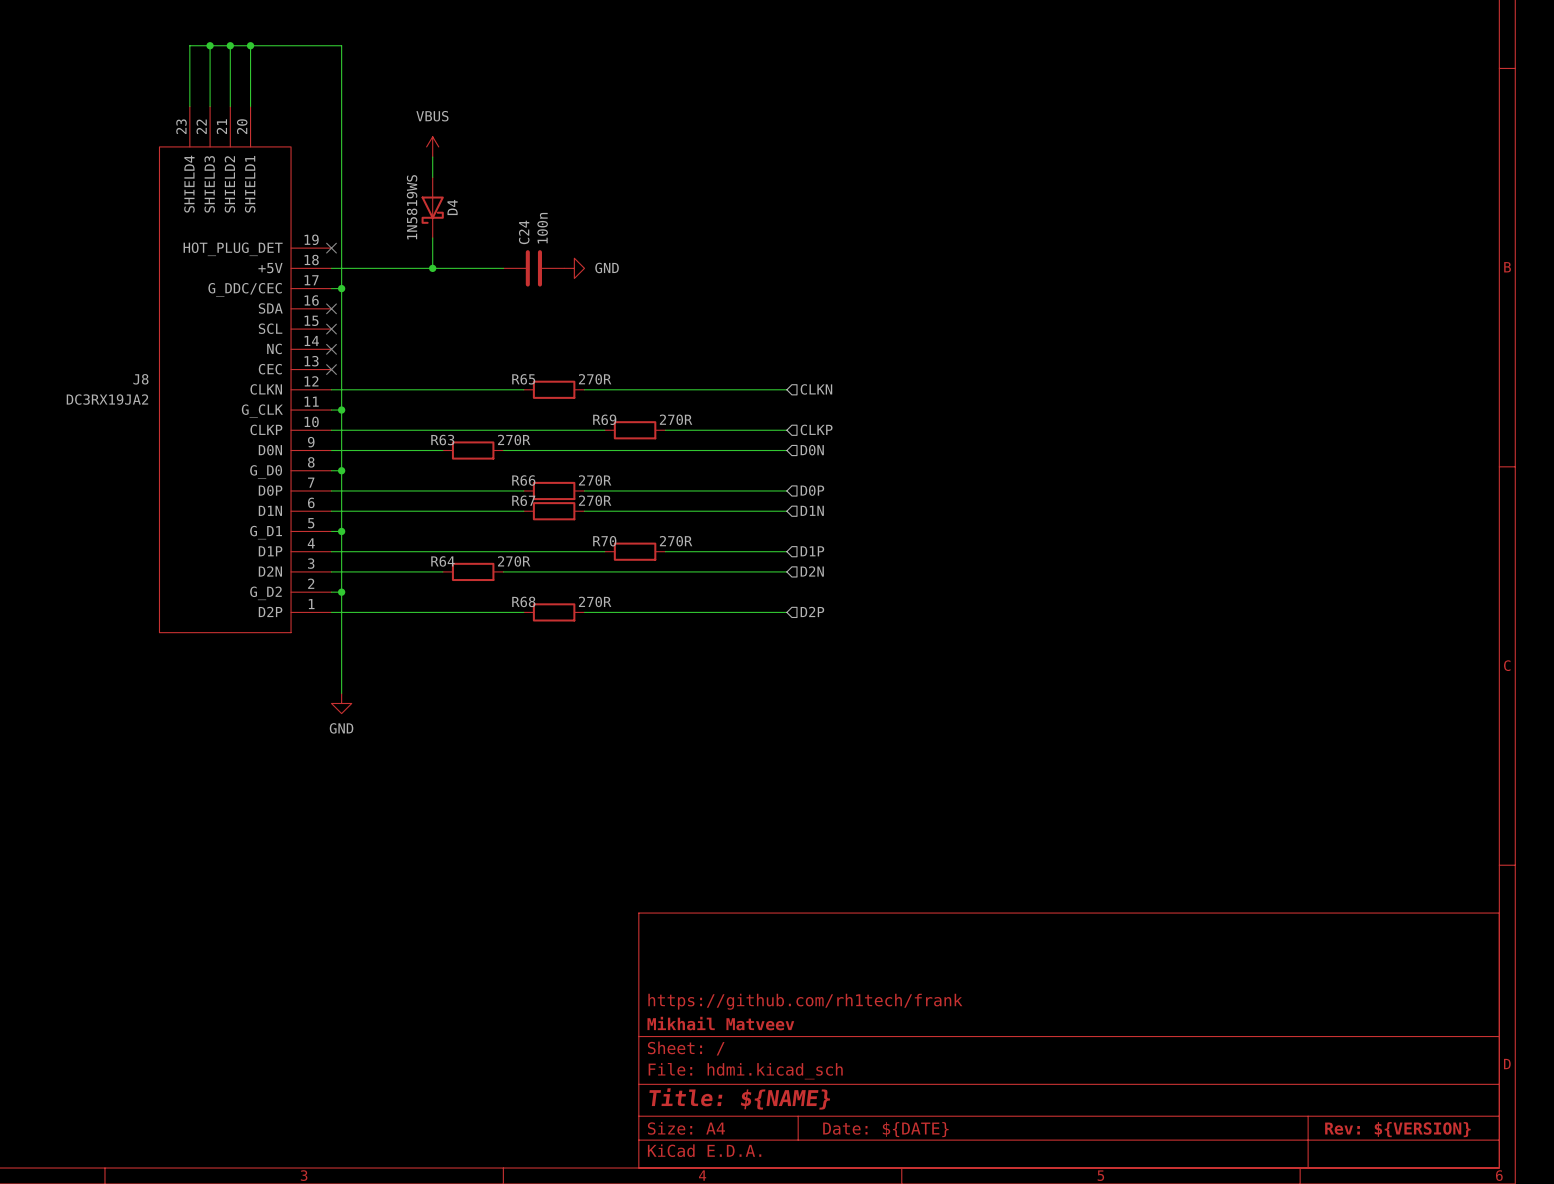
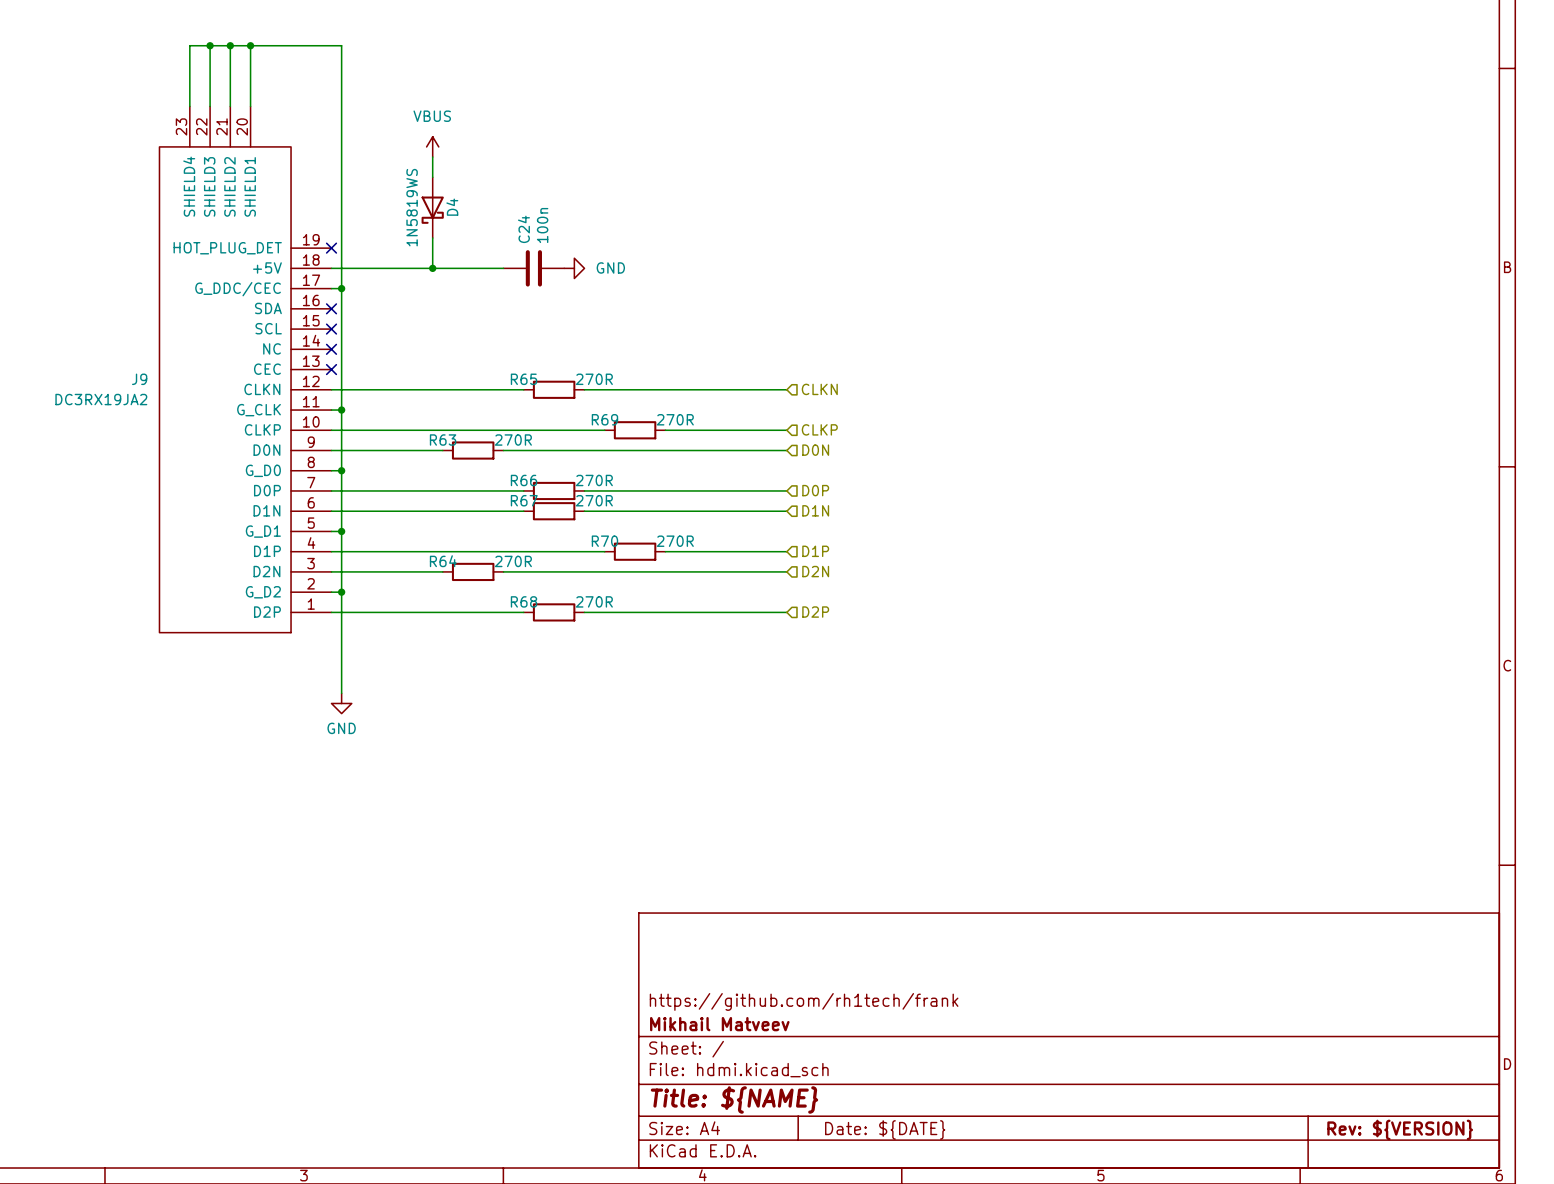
J8 name: J8 (140, 379) -> J9 (139, 379)

